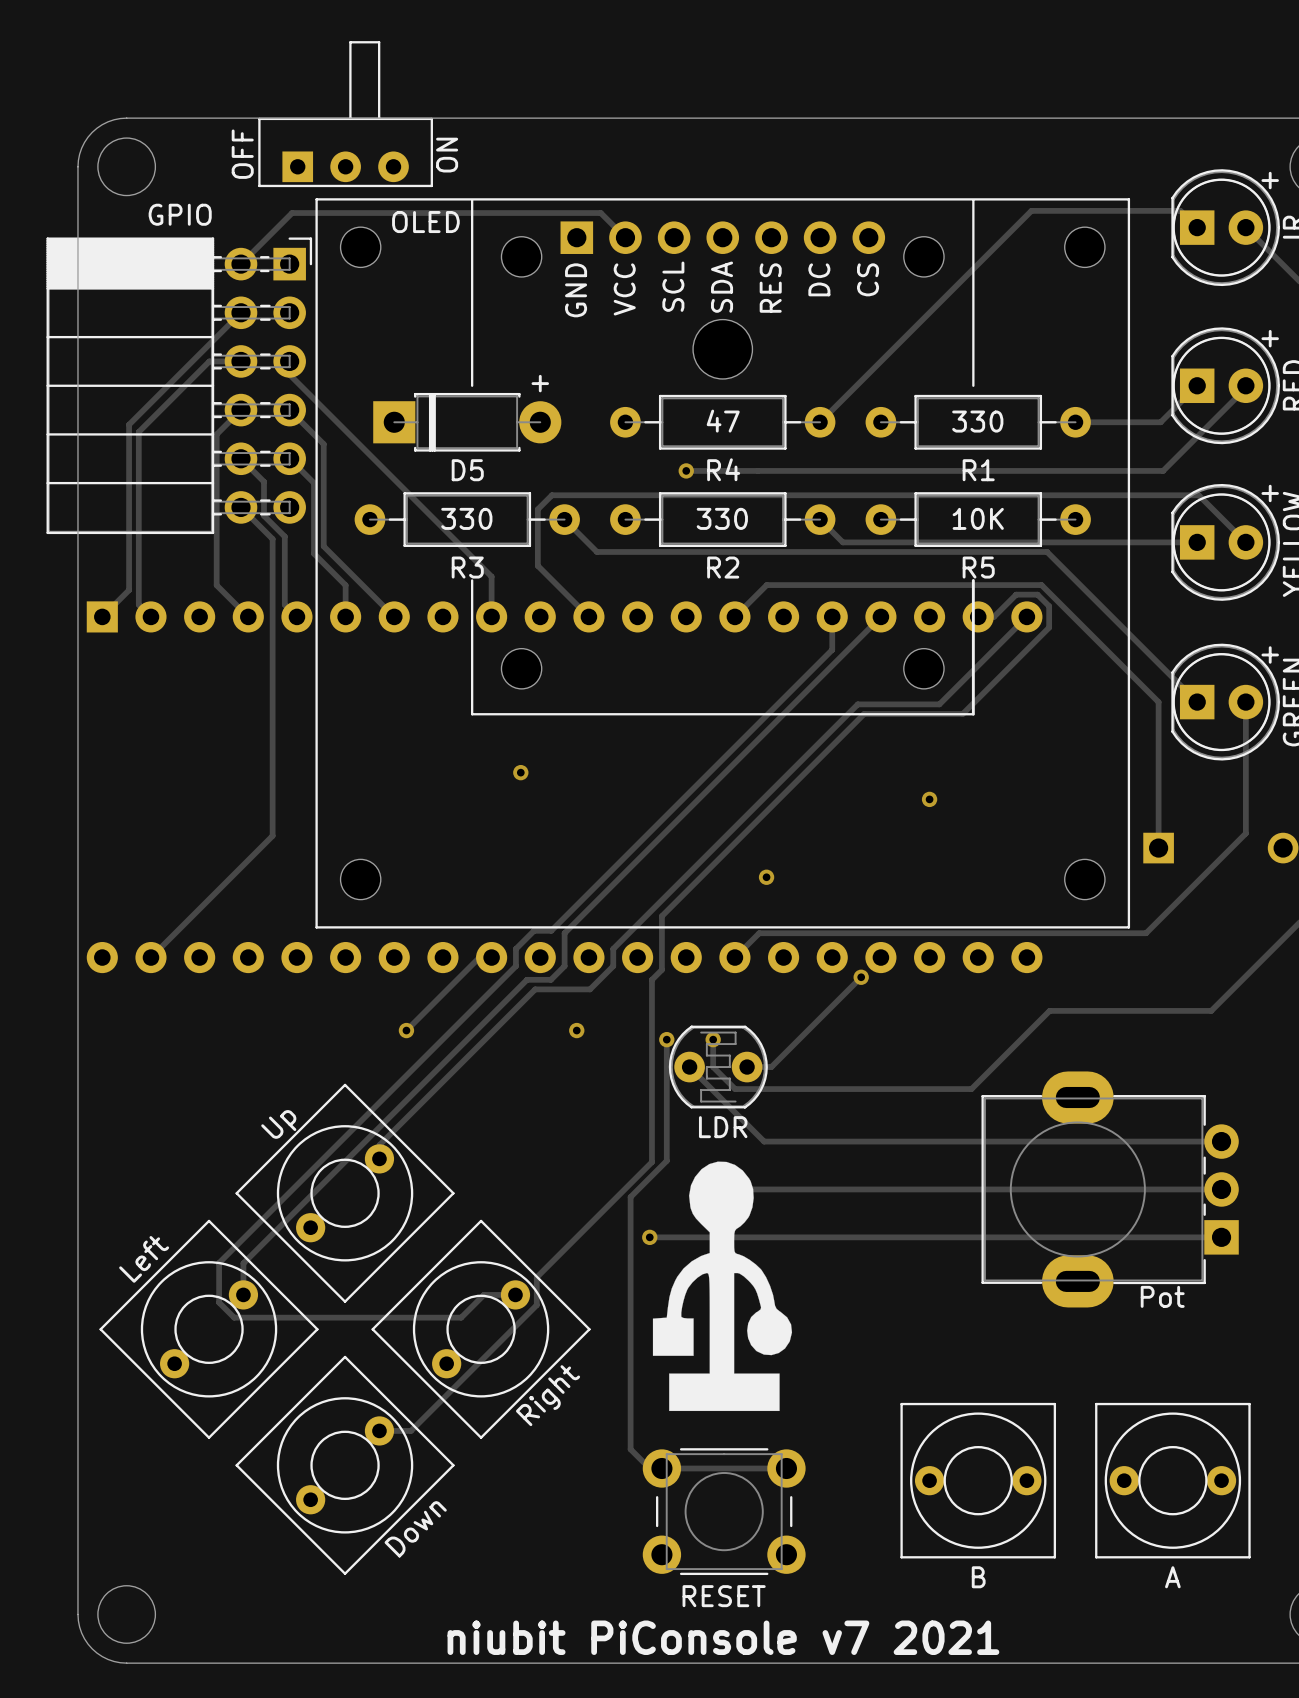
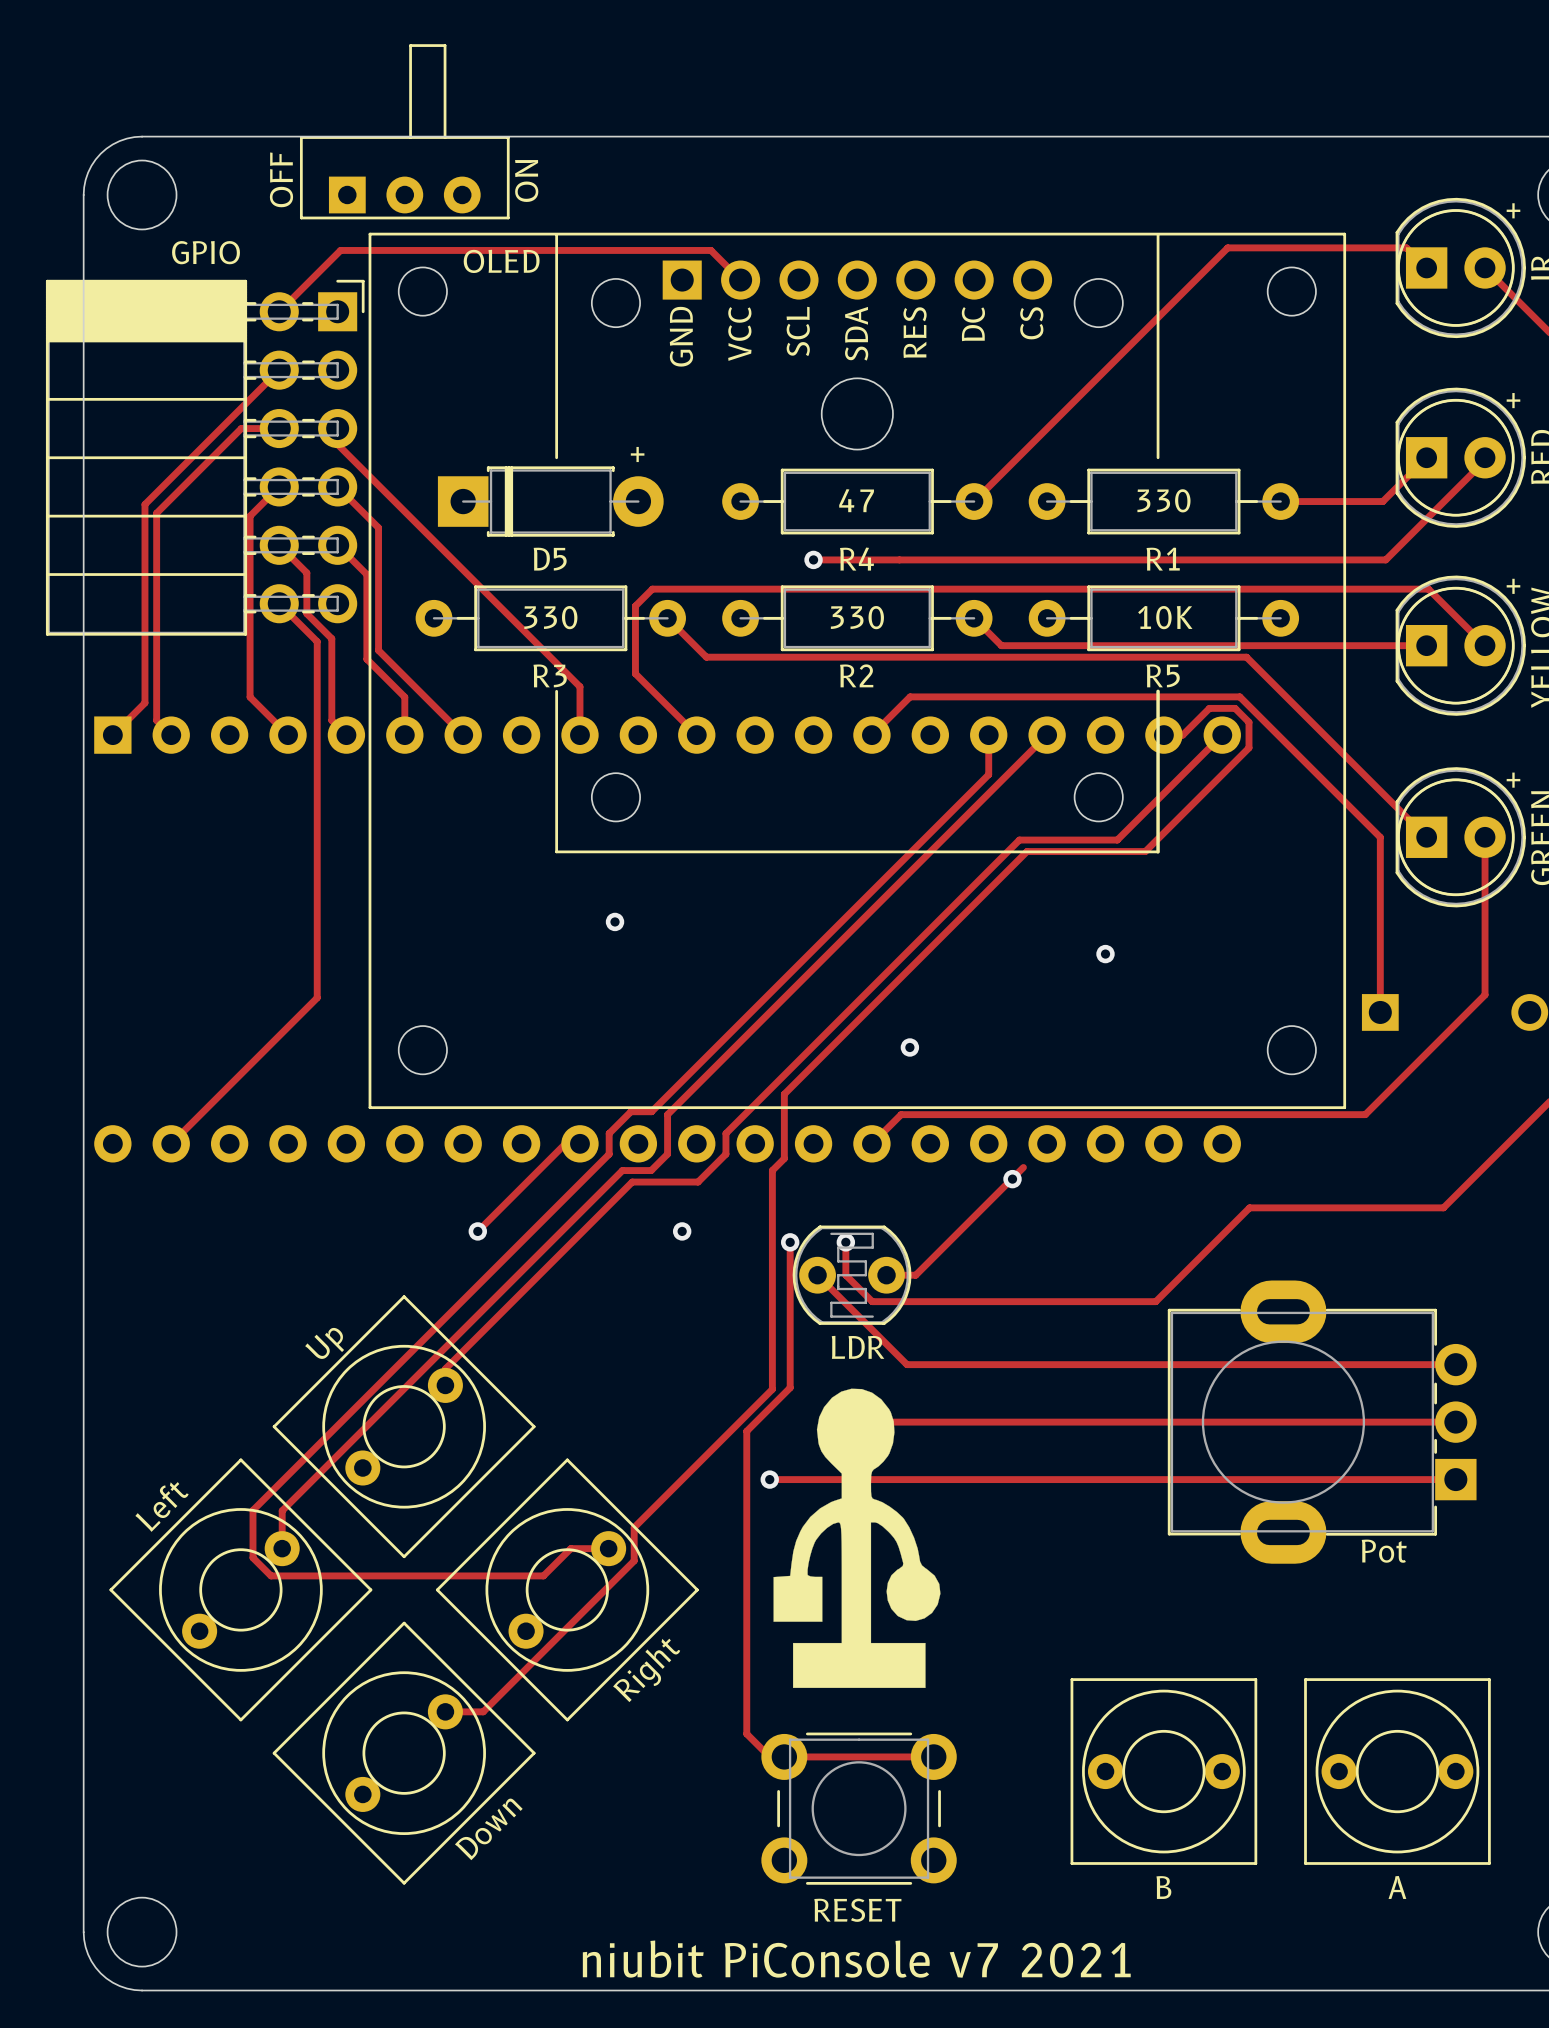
via position: (861, 977) -> (1012, 1179)

